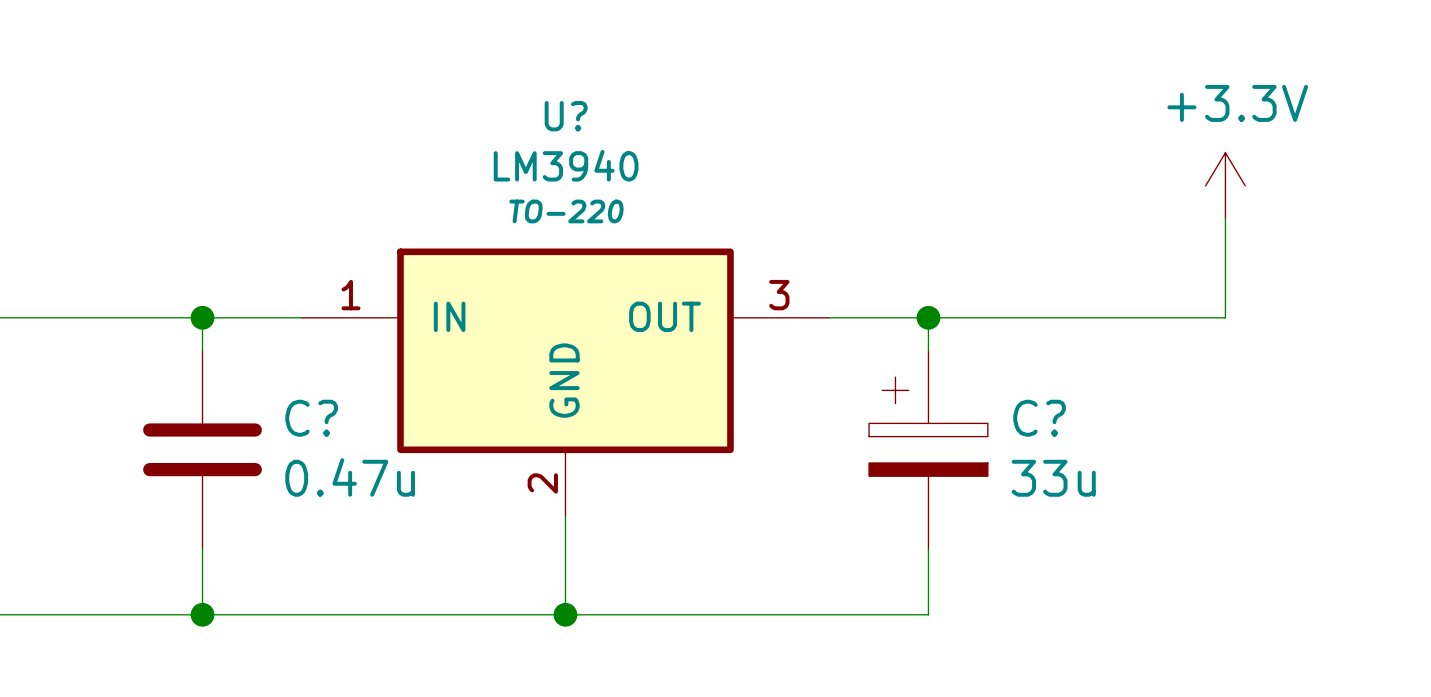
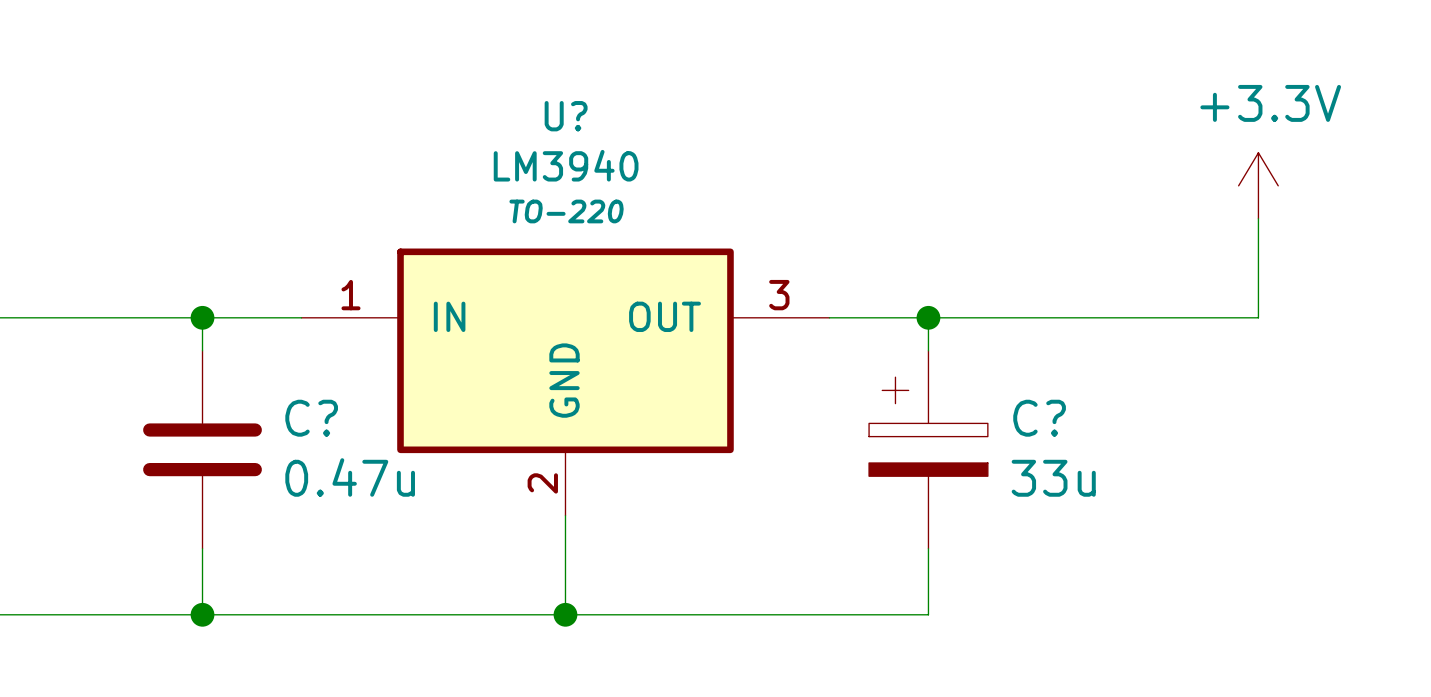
power symbol position: +3.3V (1225, 185) -> +3.3V (1258, 185)
wire: (1225, 218) (1225, 317) -> (1258, 218) (1258, 317) (1225, 317)

